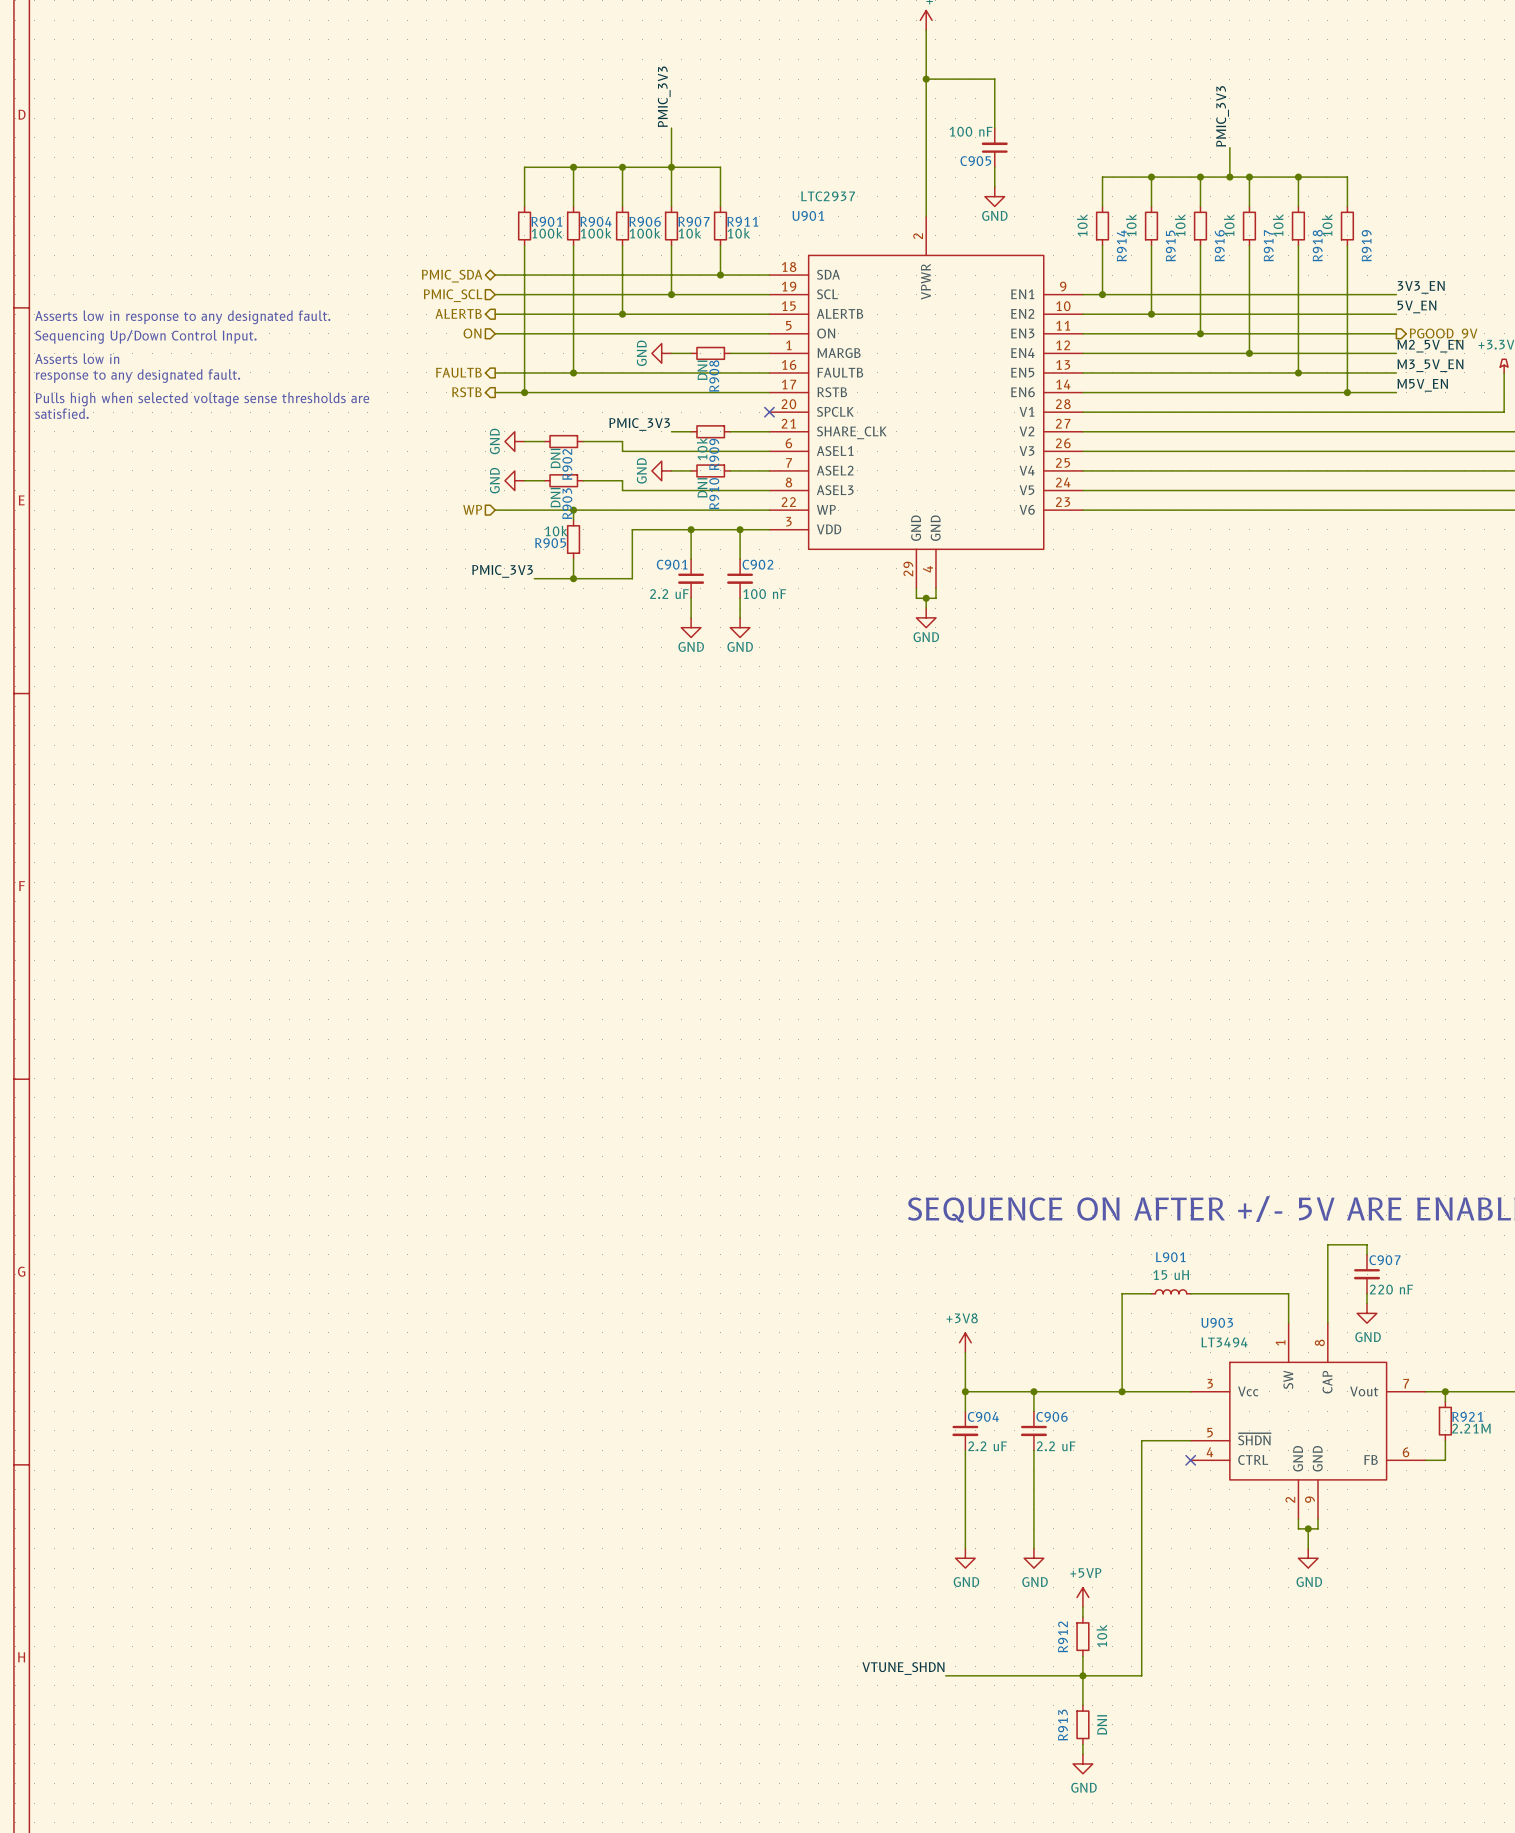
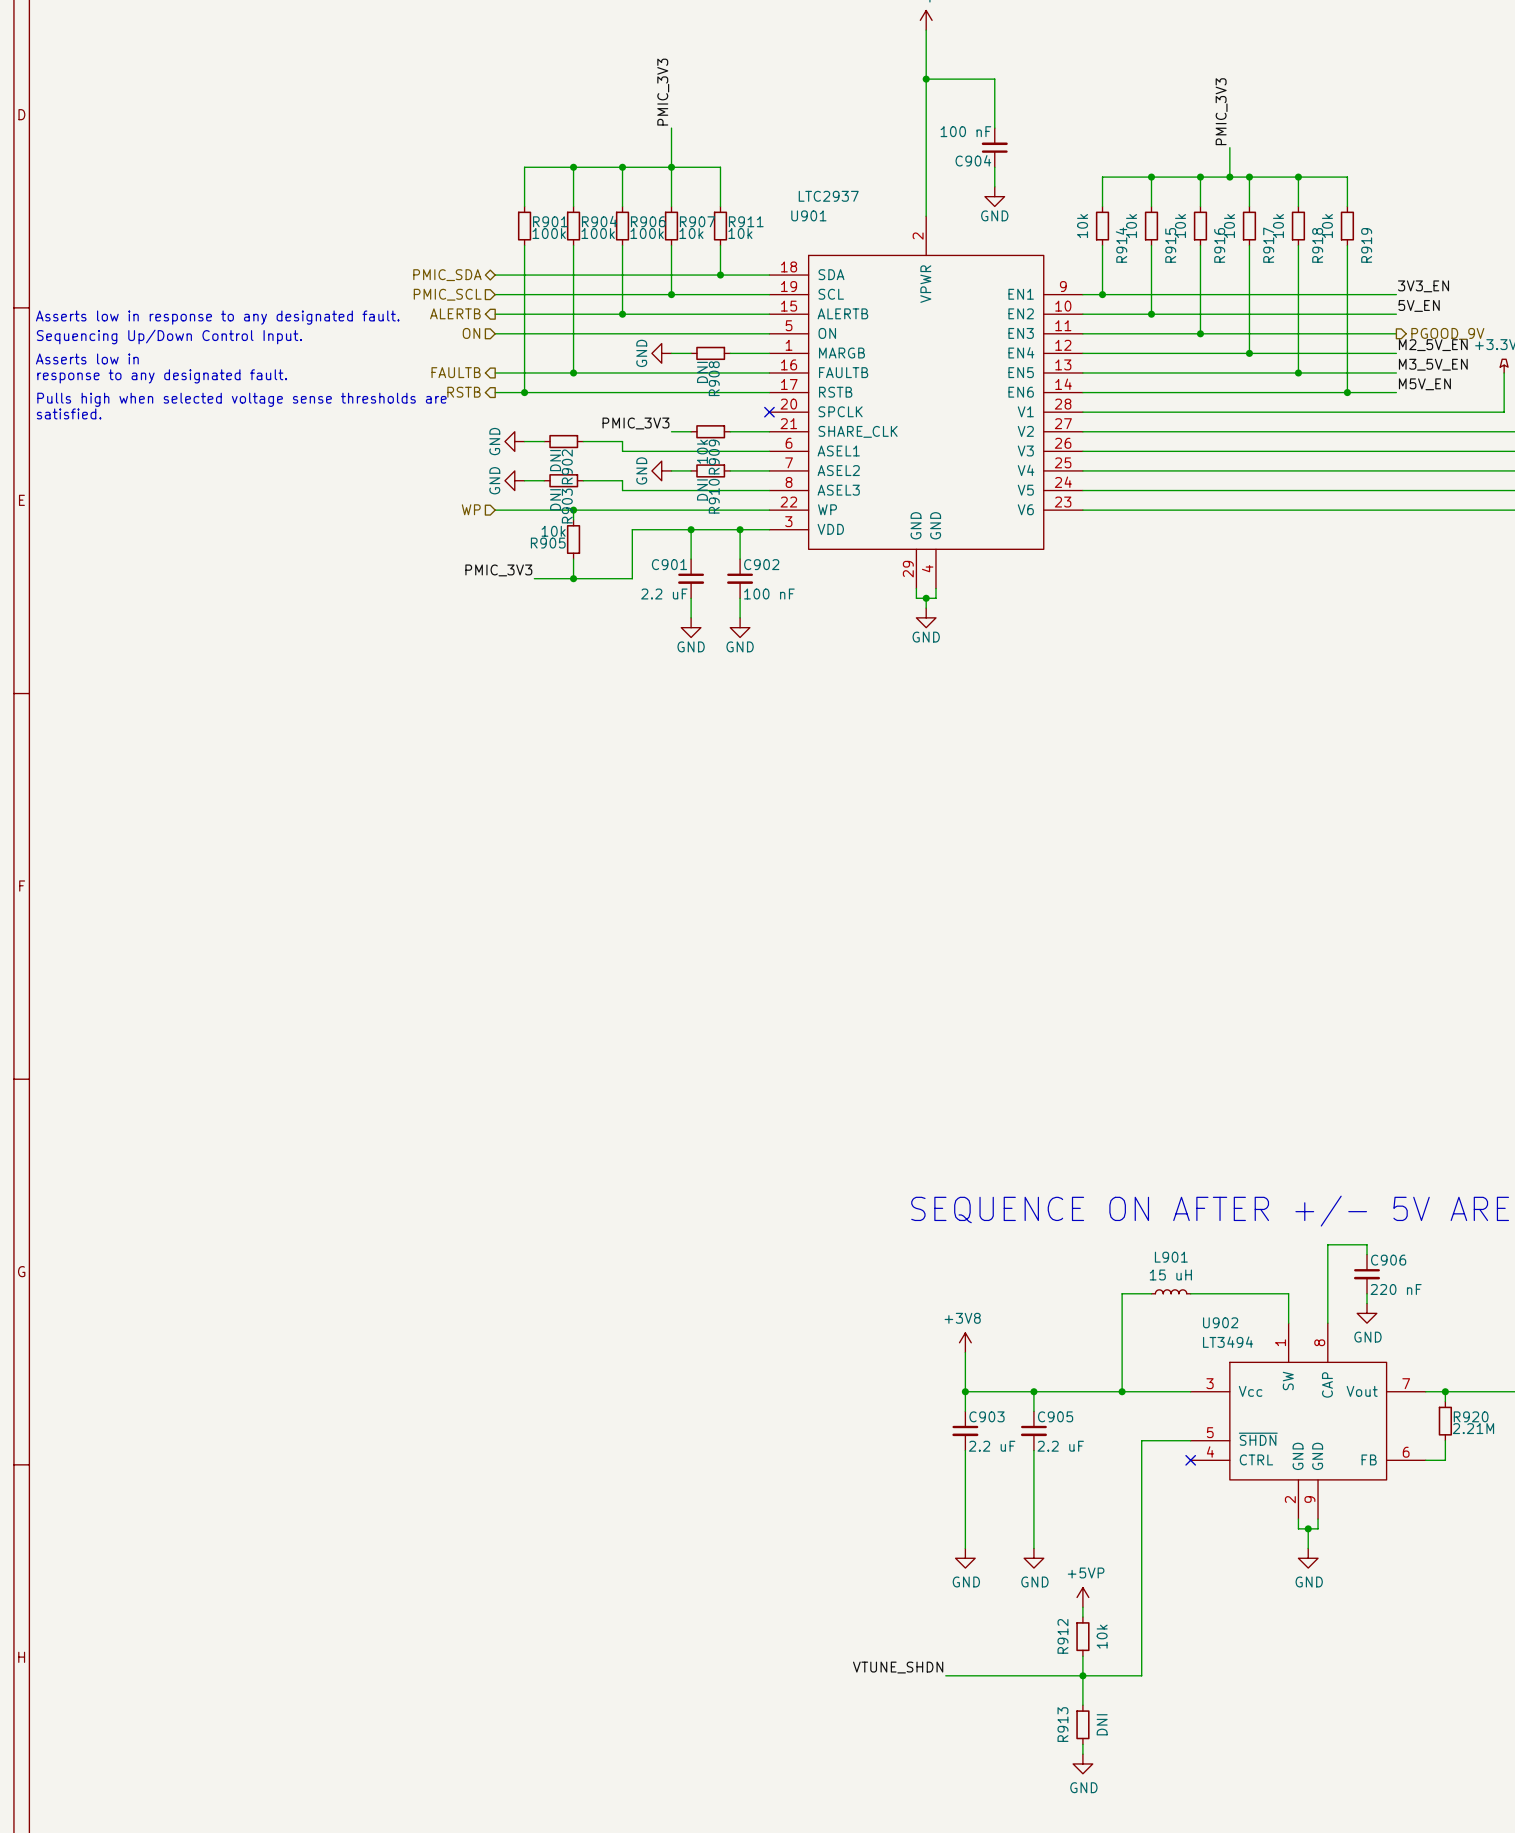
C905 name: C905 (975, 161) -> C904 (973, 160)
C907 name: C907 (1385, 1260) -> C906 (1388, 1260)
U903 name: U903 (1217, 1322) -> U902 (1220, 1322)
C904 name: C904 (983, 1416) -> C903 (987, 1416)
C906 name: C906 (1052, 1416) -> C905 (1055, 1416)
R921 name: R921 (1467, 1416) -> R920 (1471, 1416)

